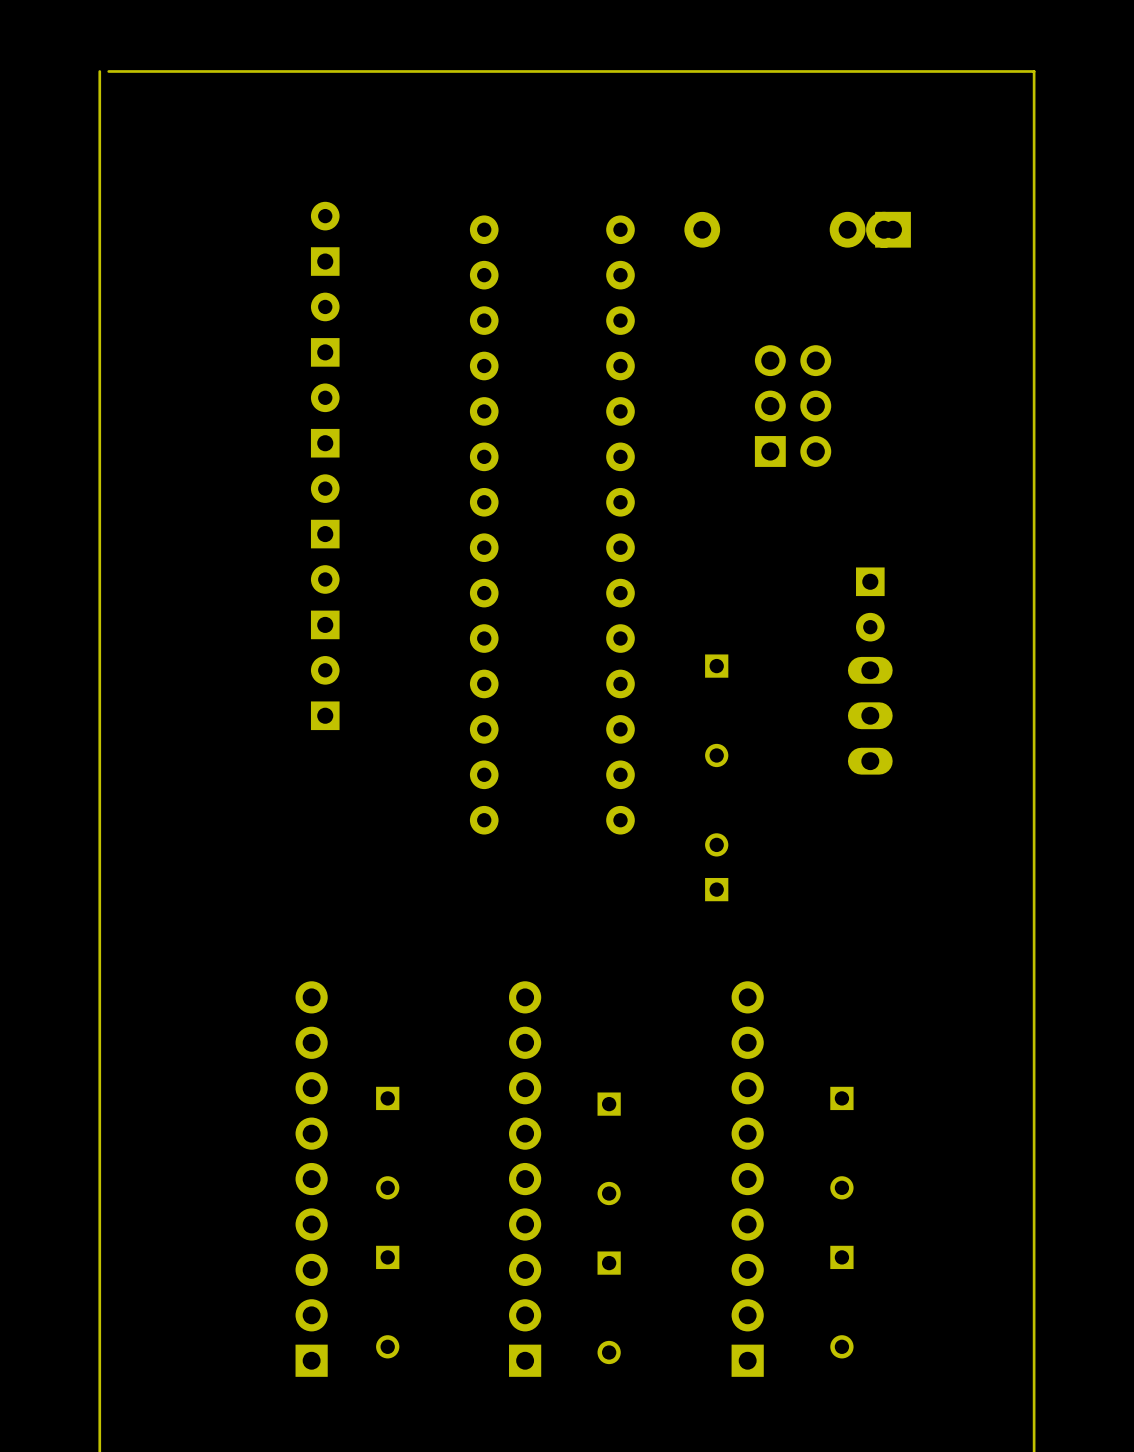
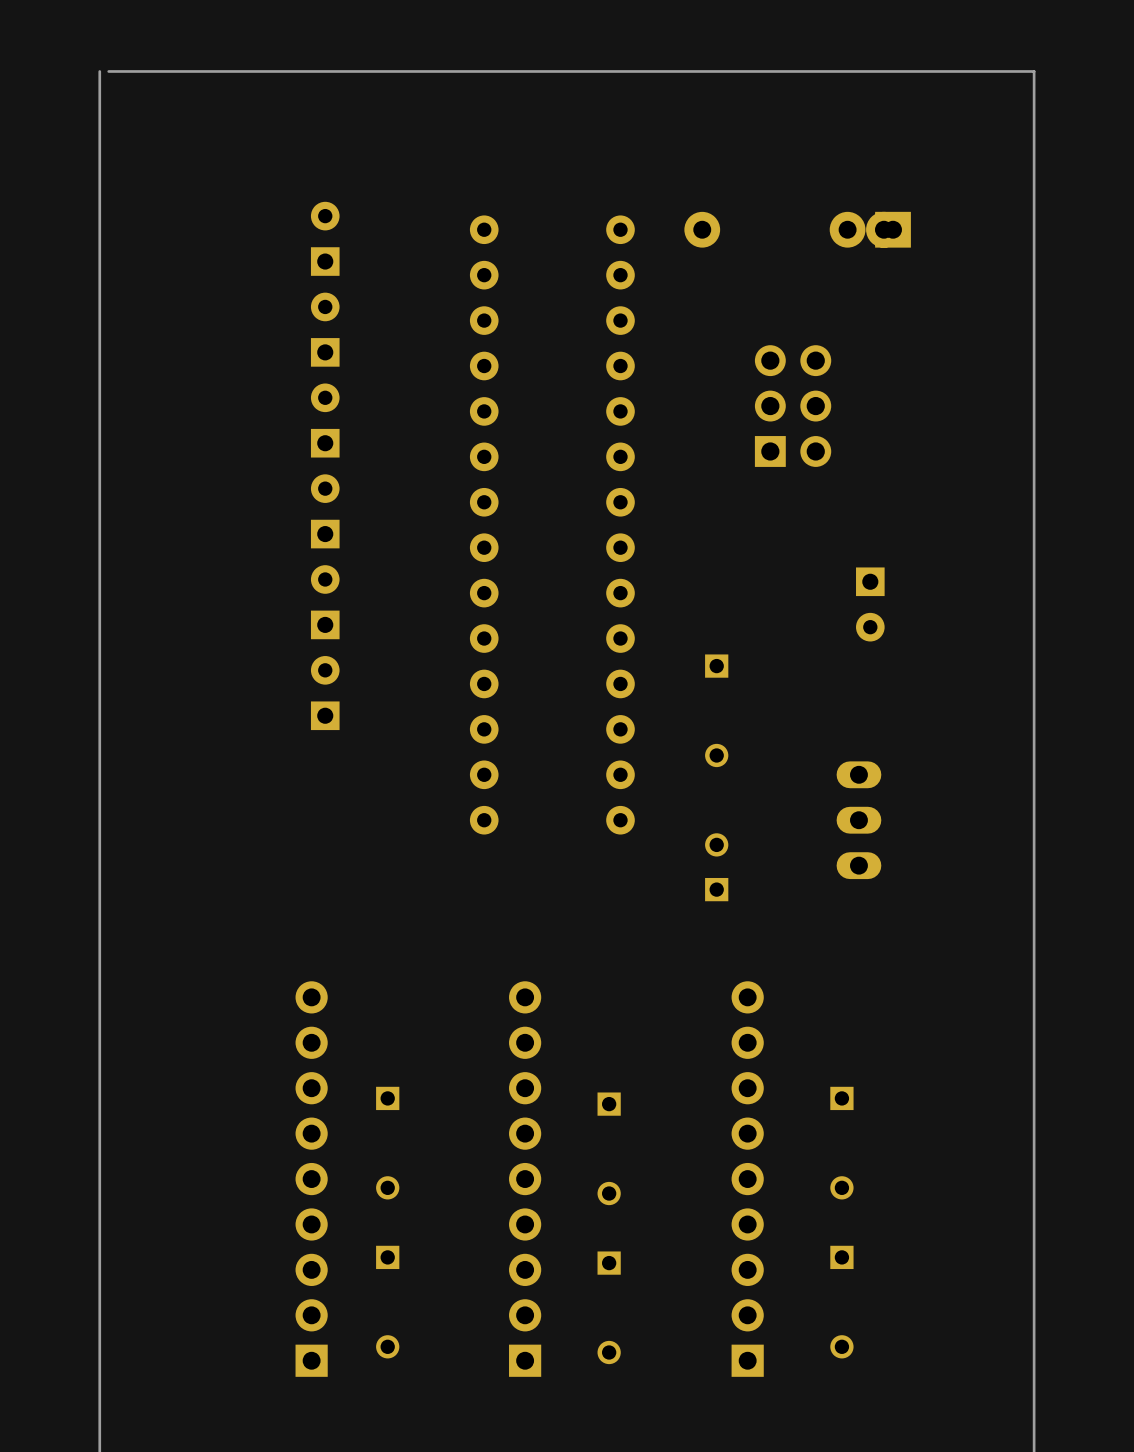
part position: (870, 715) -> (858, 820)

